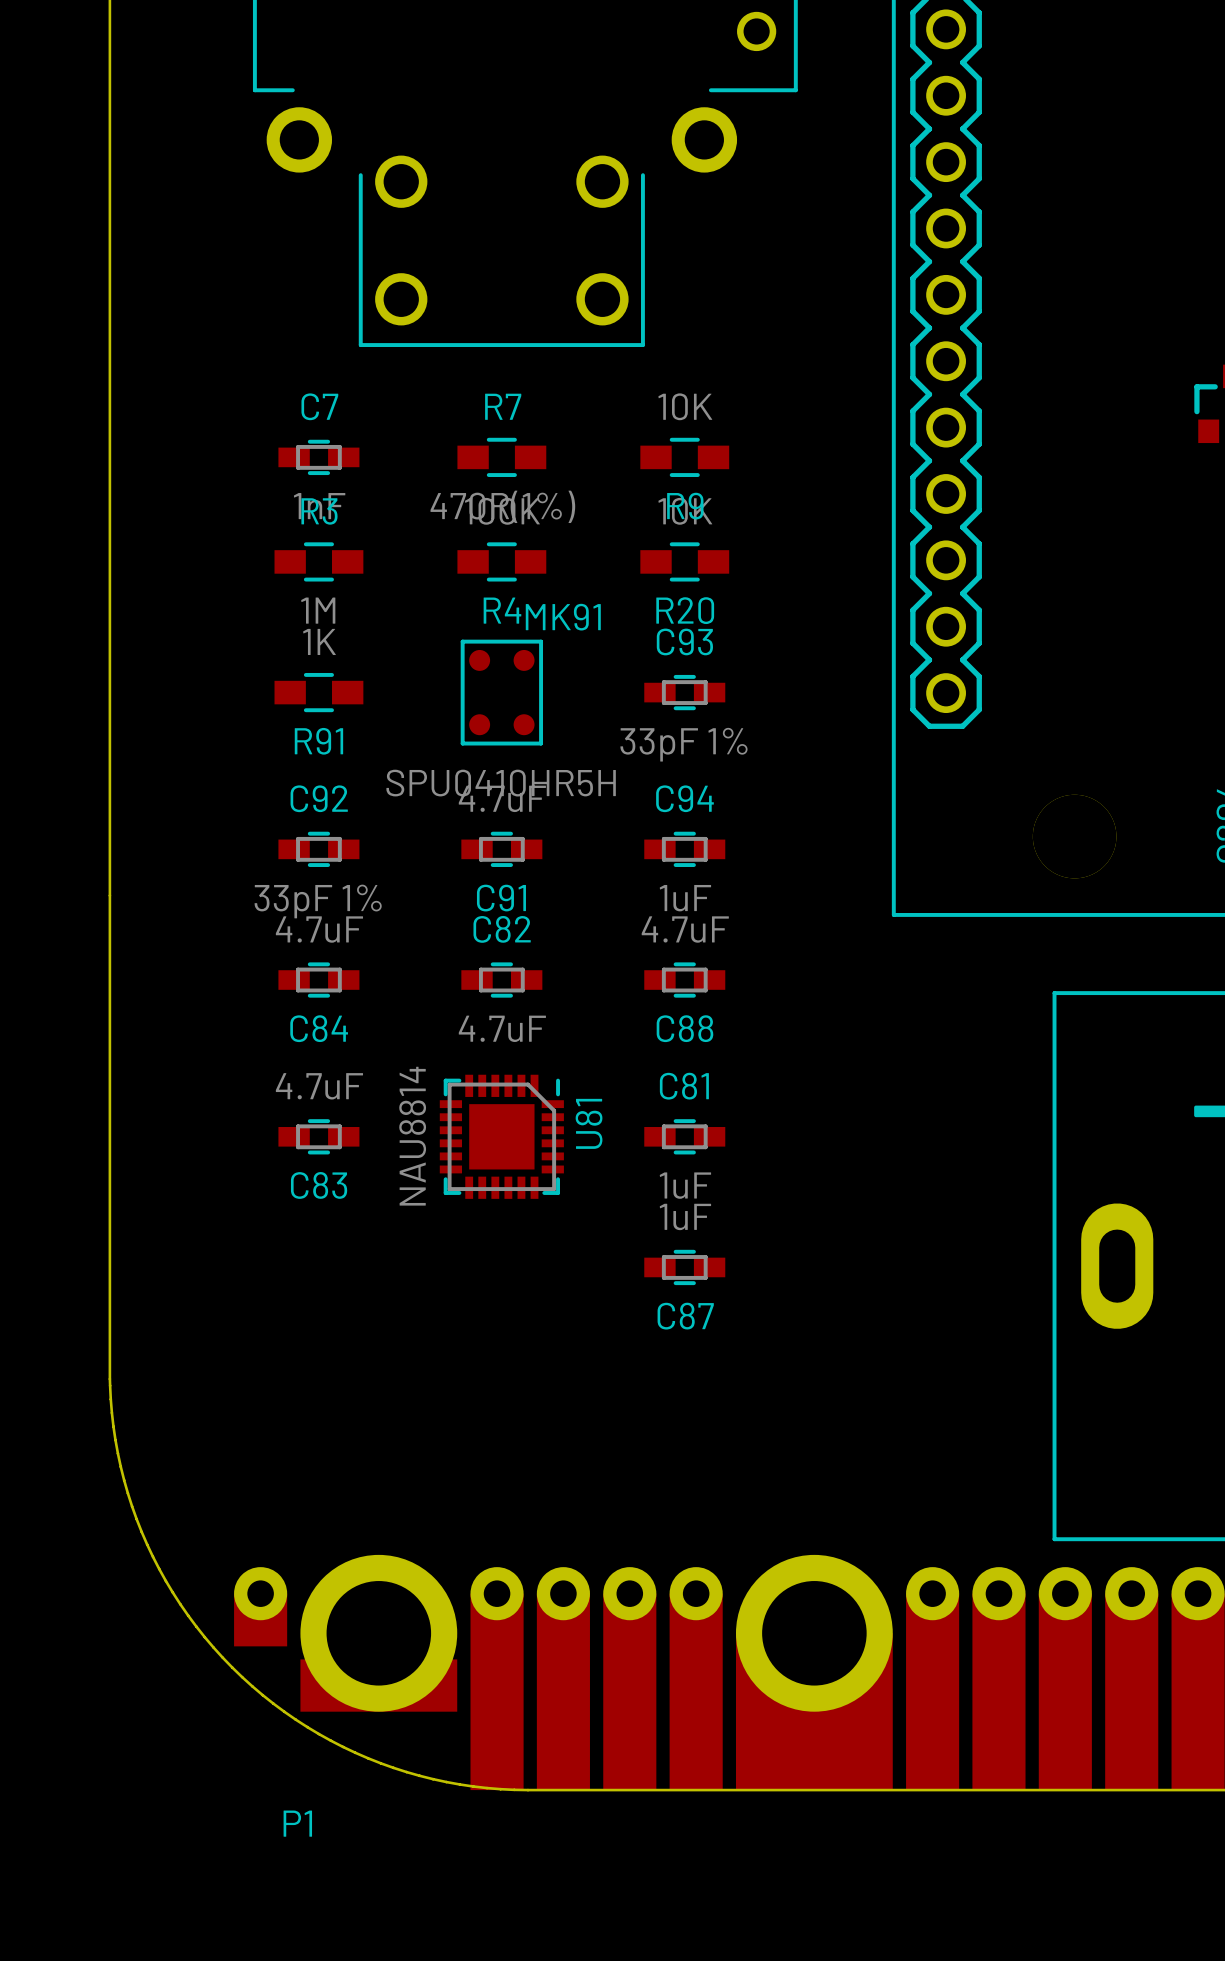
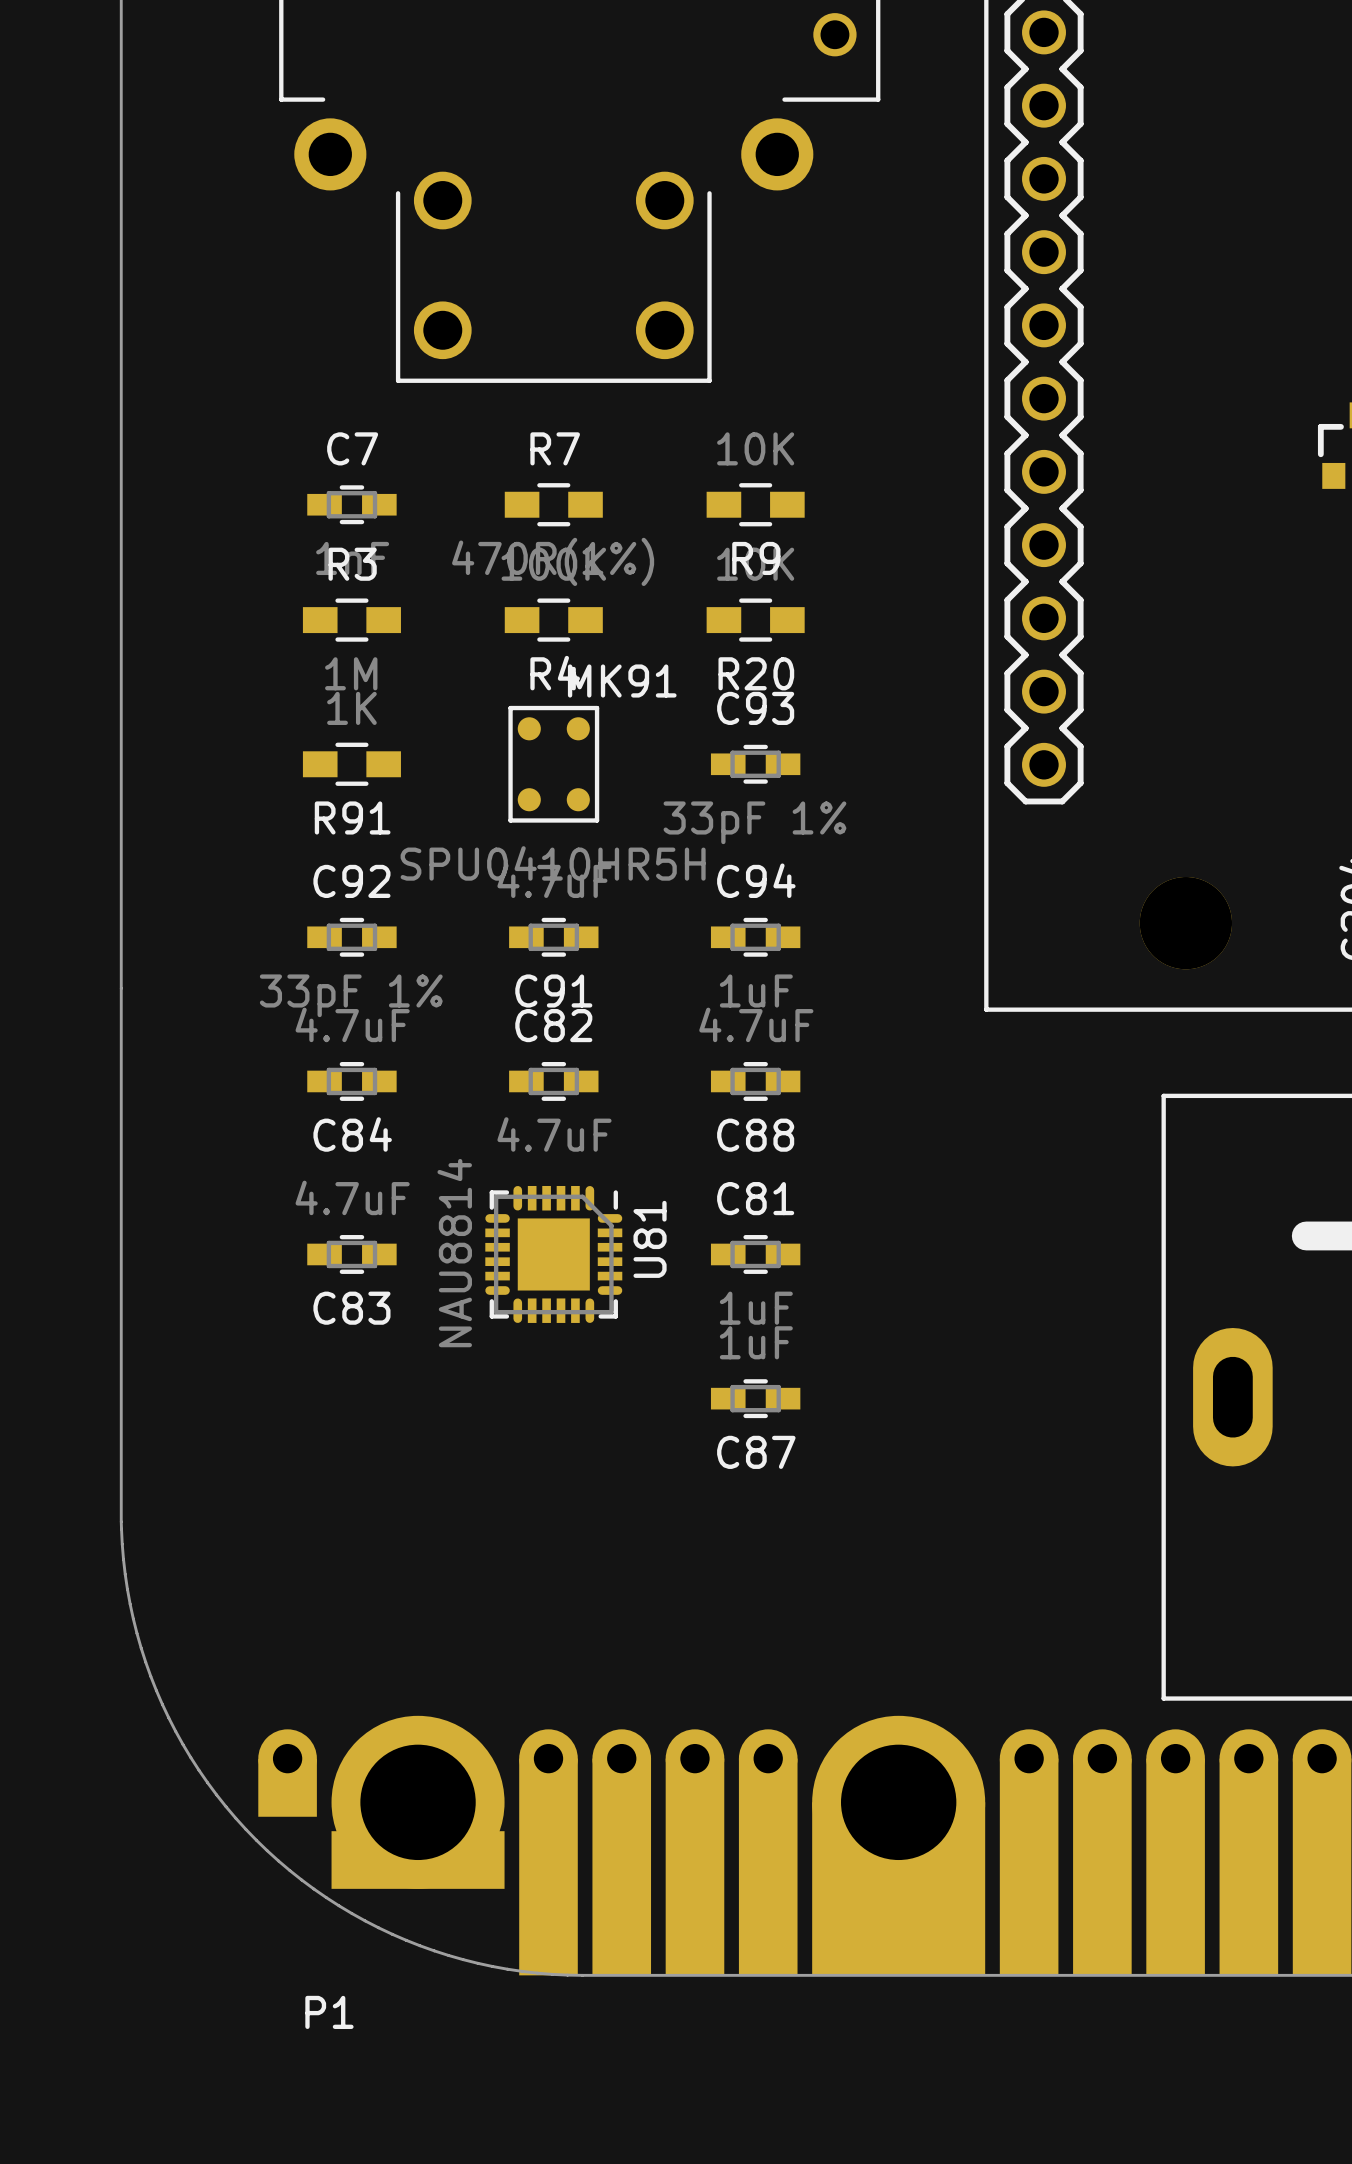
U81 footprint: [439, 1074, 564, 1199] -> [485, 1185, 623, 1323]

